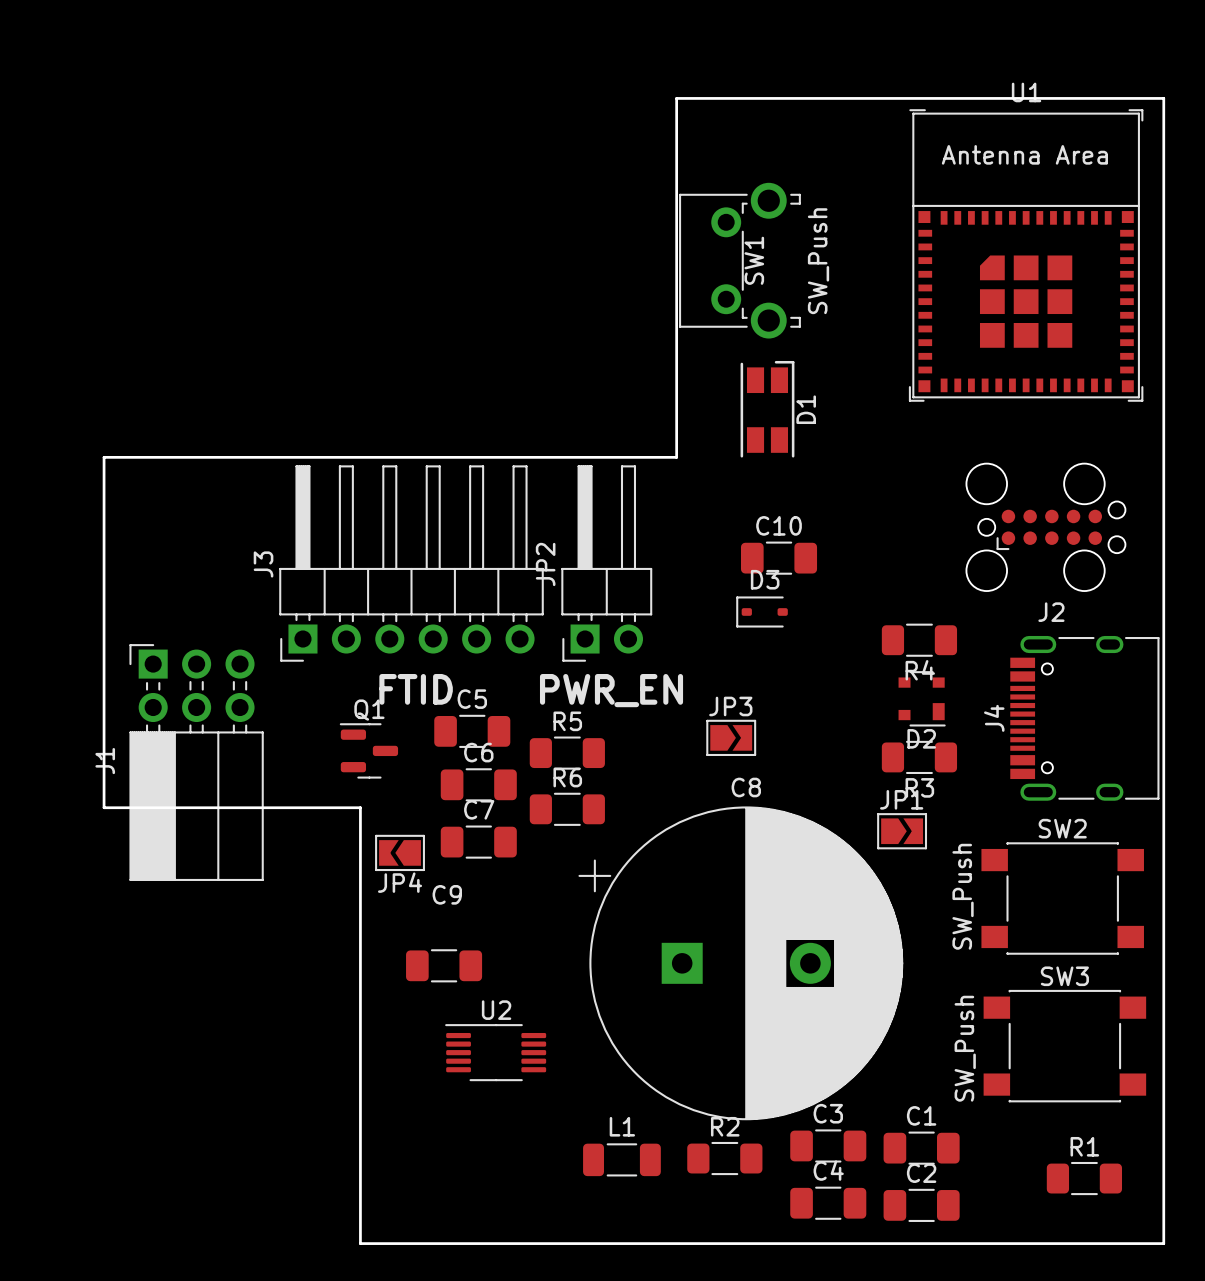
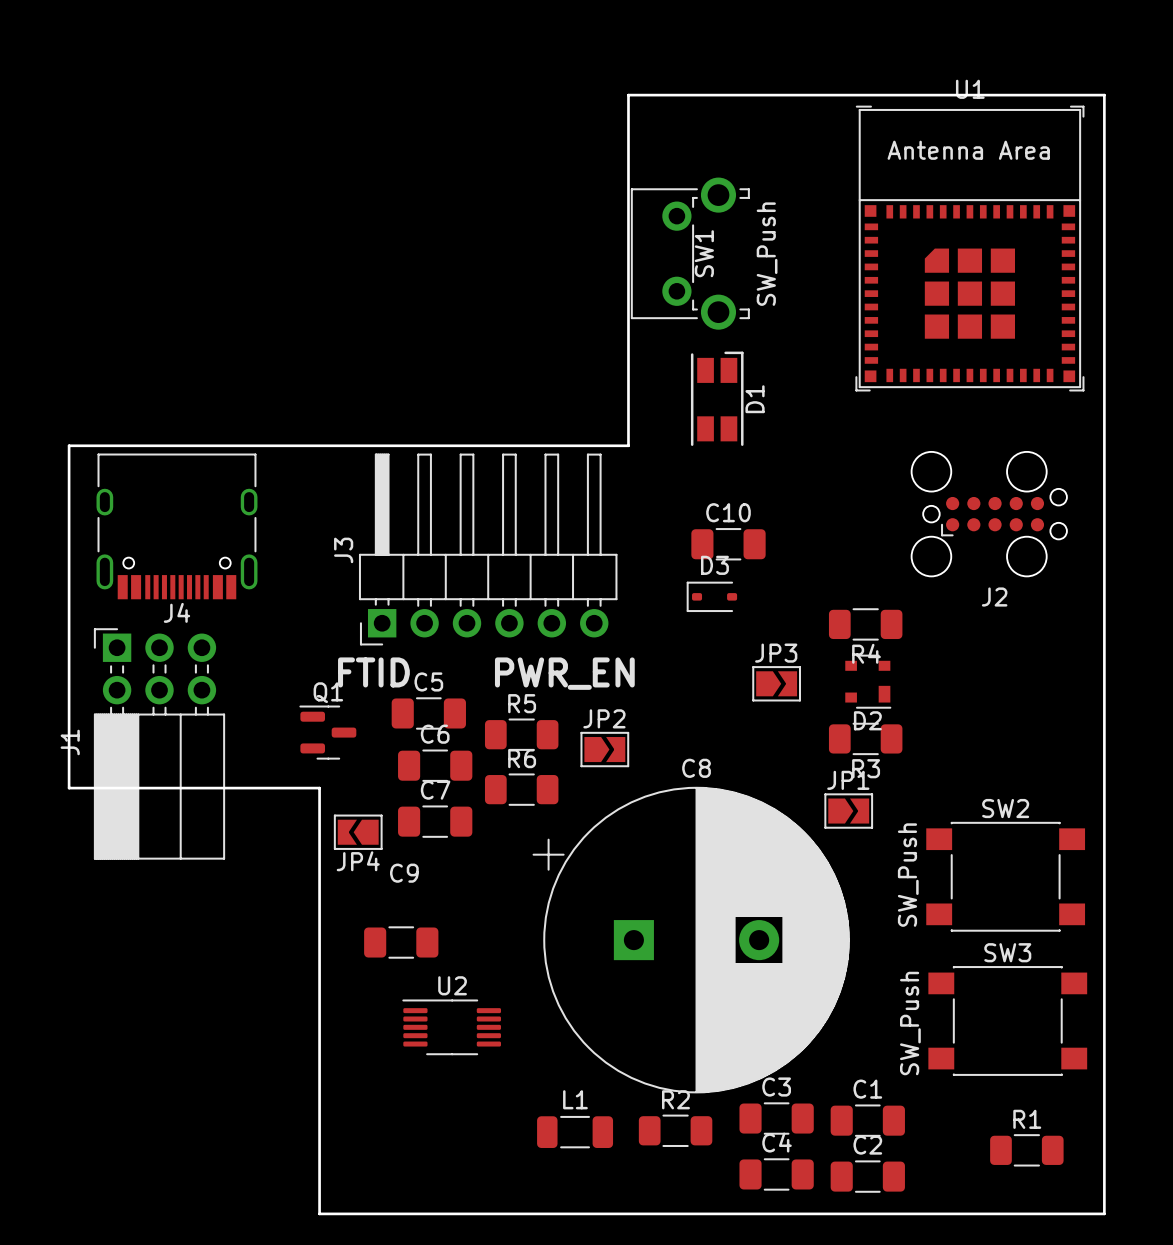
JP2 footprint: [561, 465, 653, 662] -> [580, 731, 630, 768]
J3 position: (411, 563) -> (488, 549)
JP2 name position: JP2 (545, 564) -> JP2 (604, 718)
J4 rotation: 0° (1084, 718) -> 90° counterclockwise (176, 526)
J4 position: (1084, 718) -> (176, 526)
JP3 position: (731, 737) -> (776, 683)

